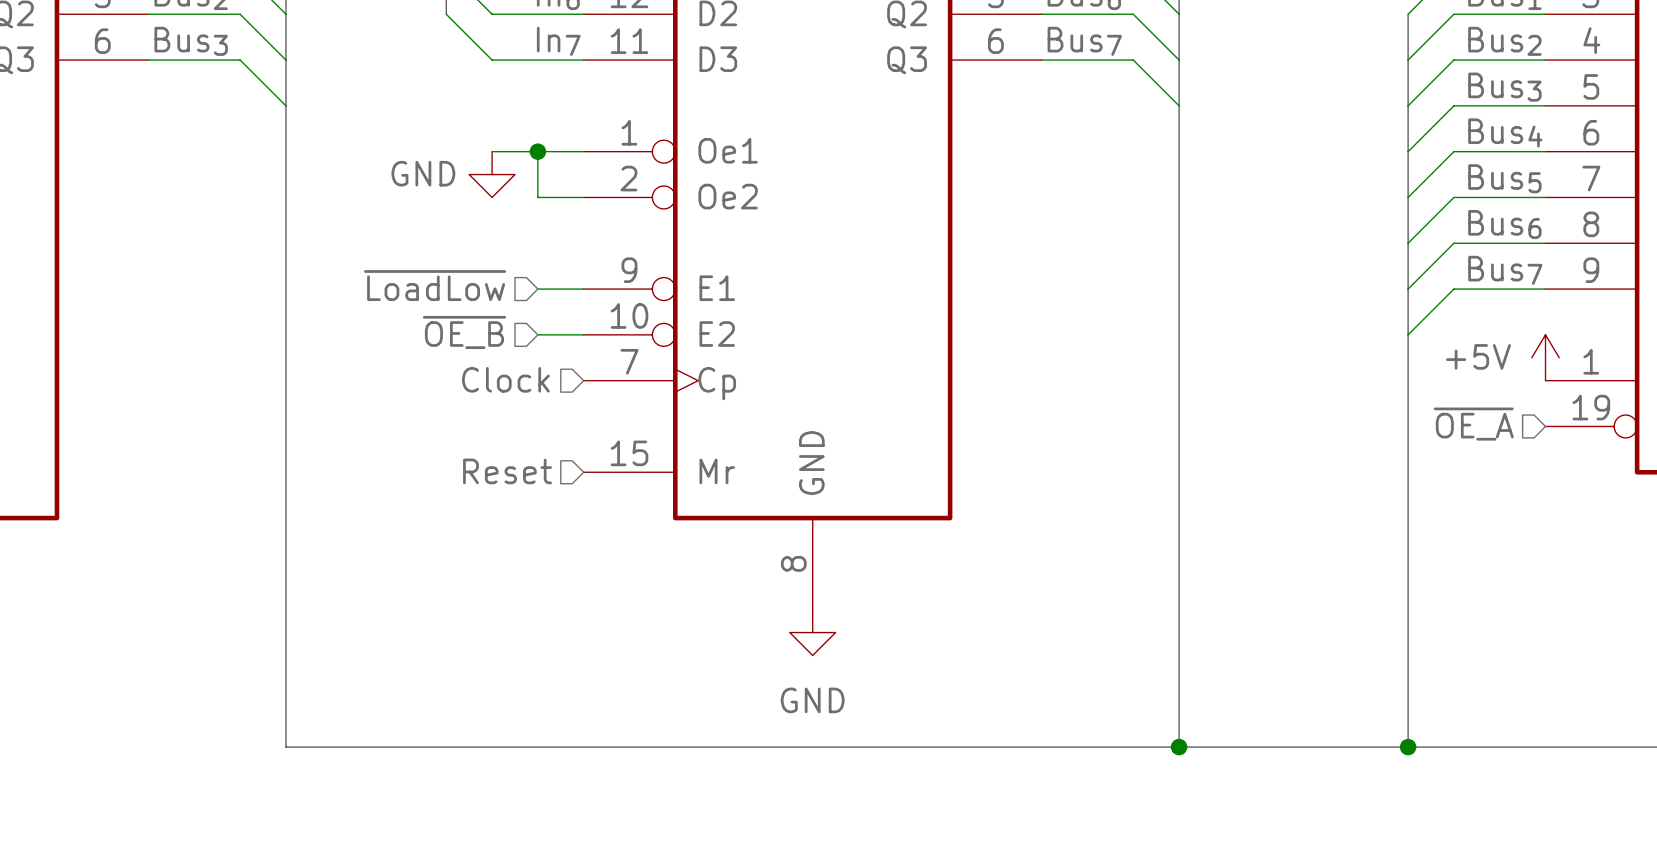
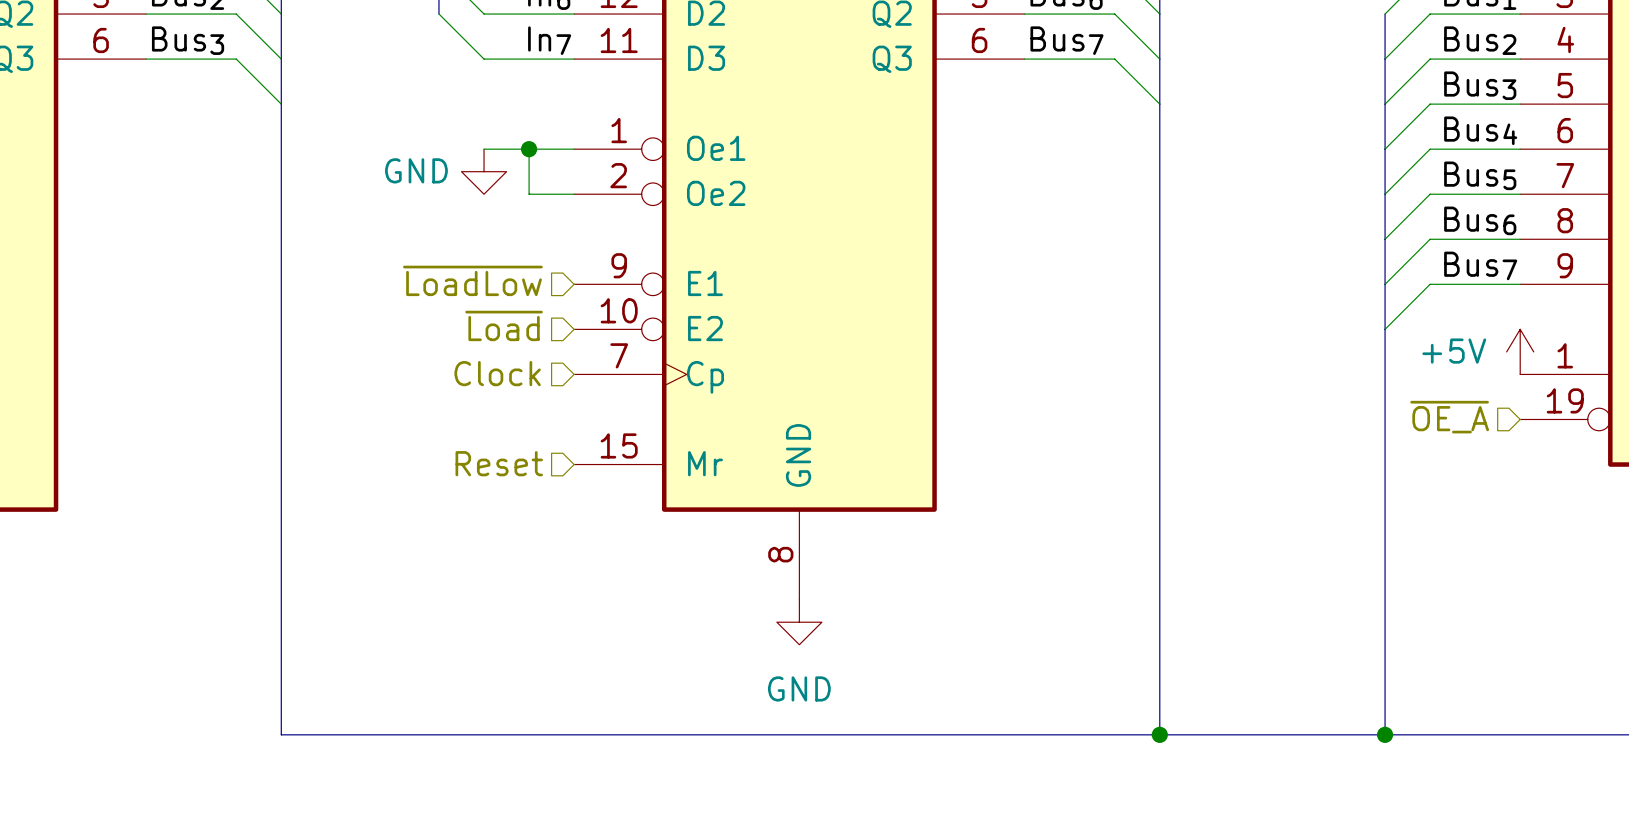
hierarchical label position: ~{LoadLow} (435, 285) -> ~{LoadLow} (472, 280)
wire: (537, 289) (583, 289) -> none
hierarchical label: none -> ~{Load} (504, 325)
hierarchical label: ~{OE_B} (464, 332) -> none
wire: (537, 334) (583, 334) -> none

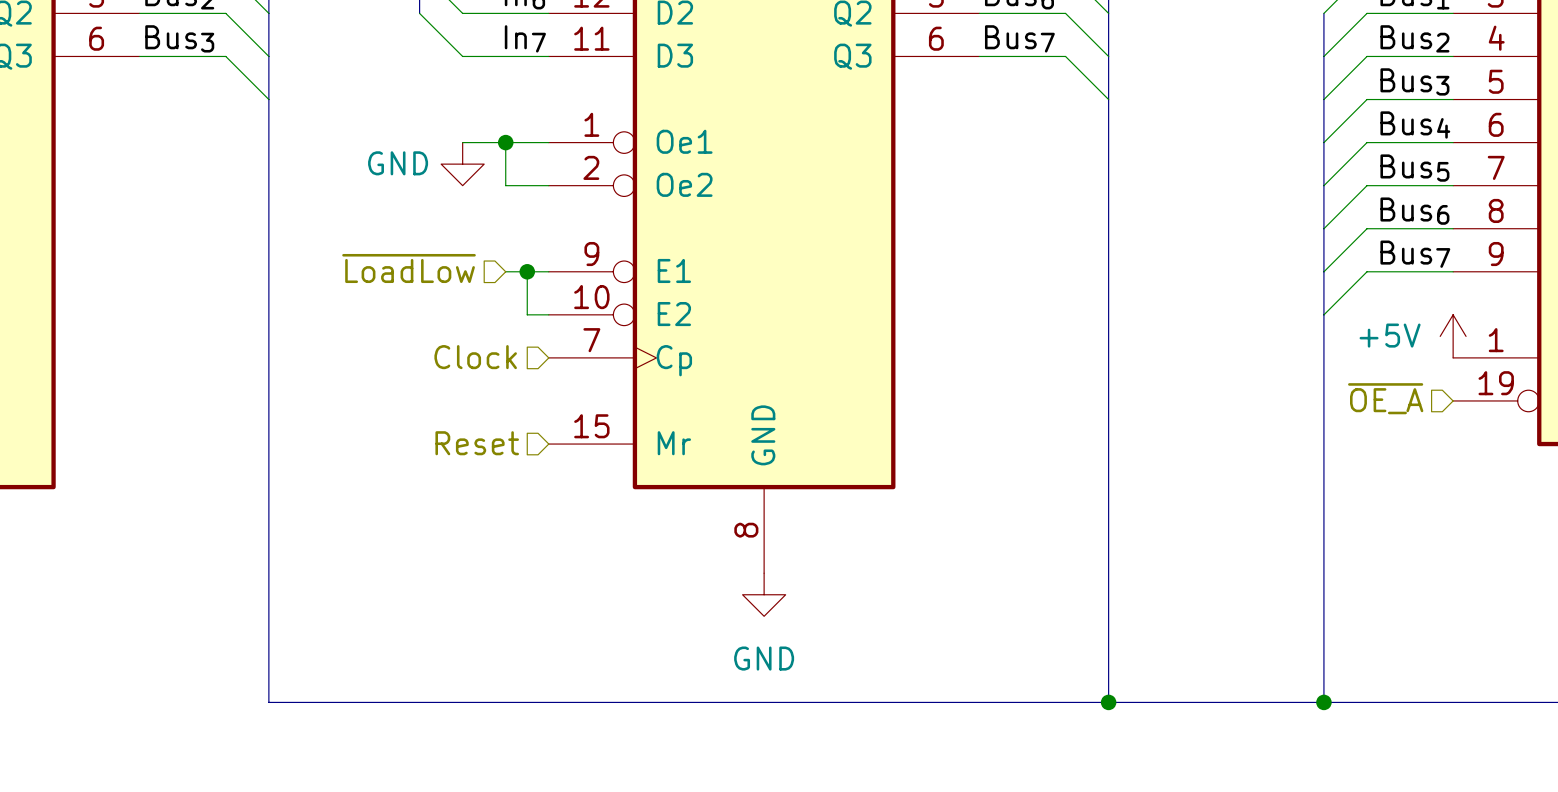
hierarchical label position: ~{LoadLow} (472, 280) -> ~{LoadLow} (409, 268)
wire: none -> (505, 271) (548, 271)
wire: none -> (527, 271) (527, 314) (548, 314)
junction: none -> (527, 271)
hierarchical label: ~{Load} (504, 325) -> none

